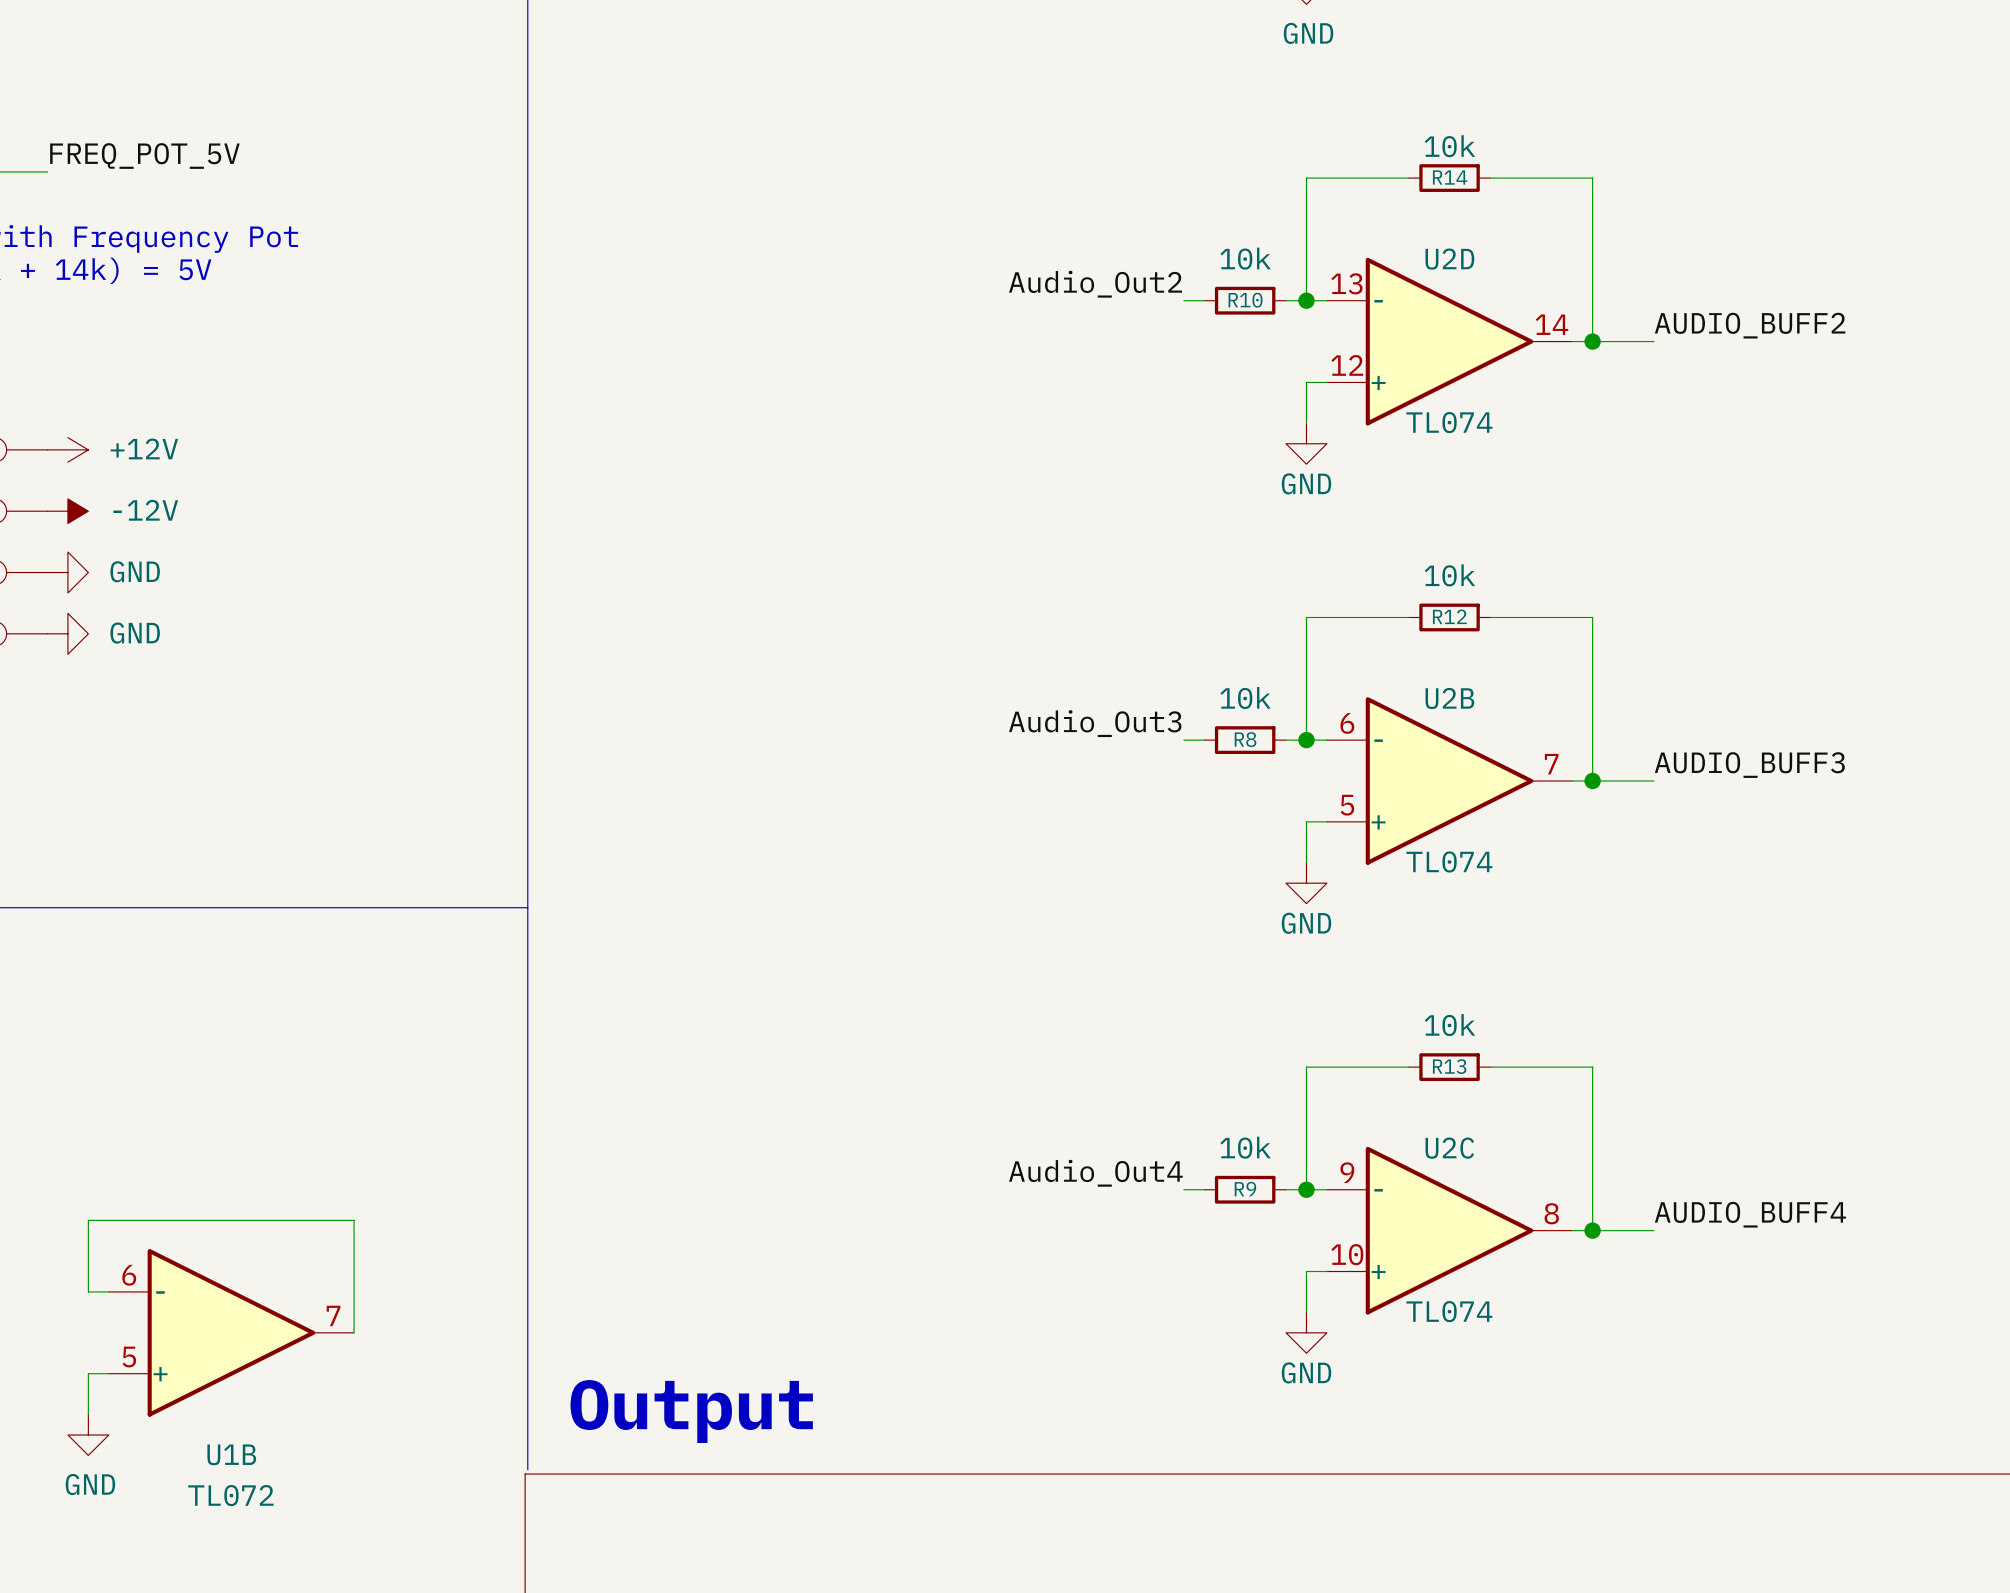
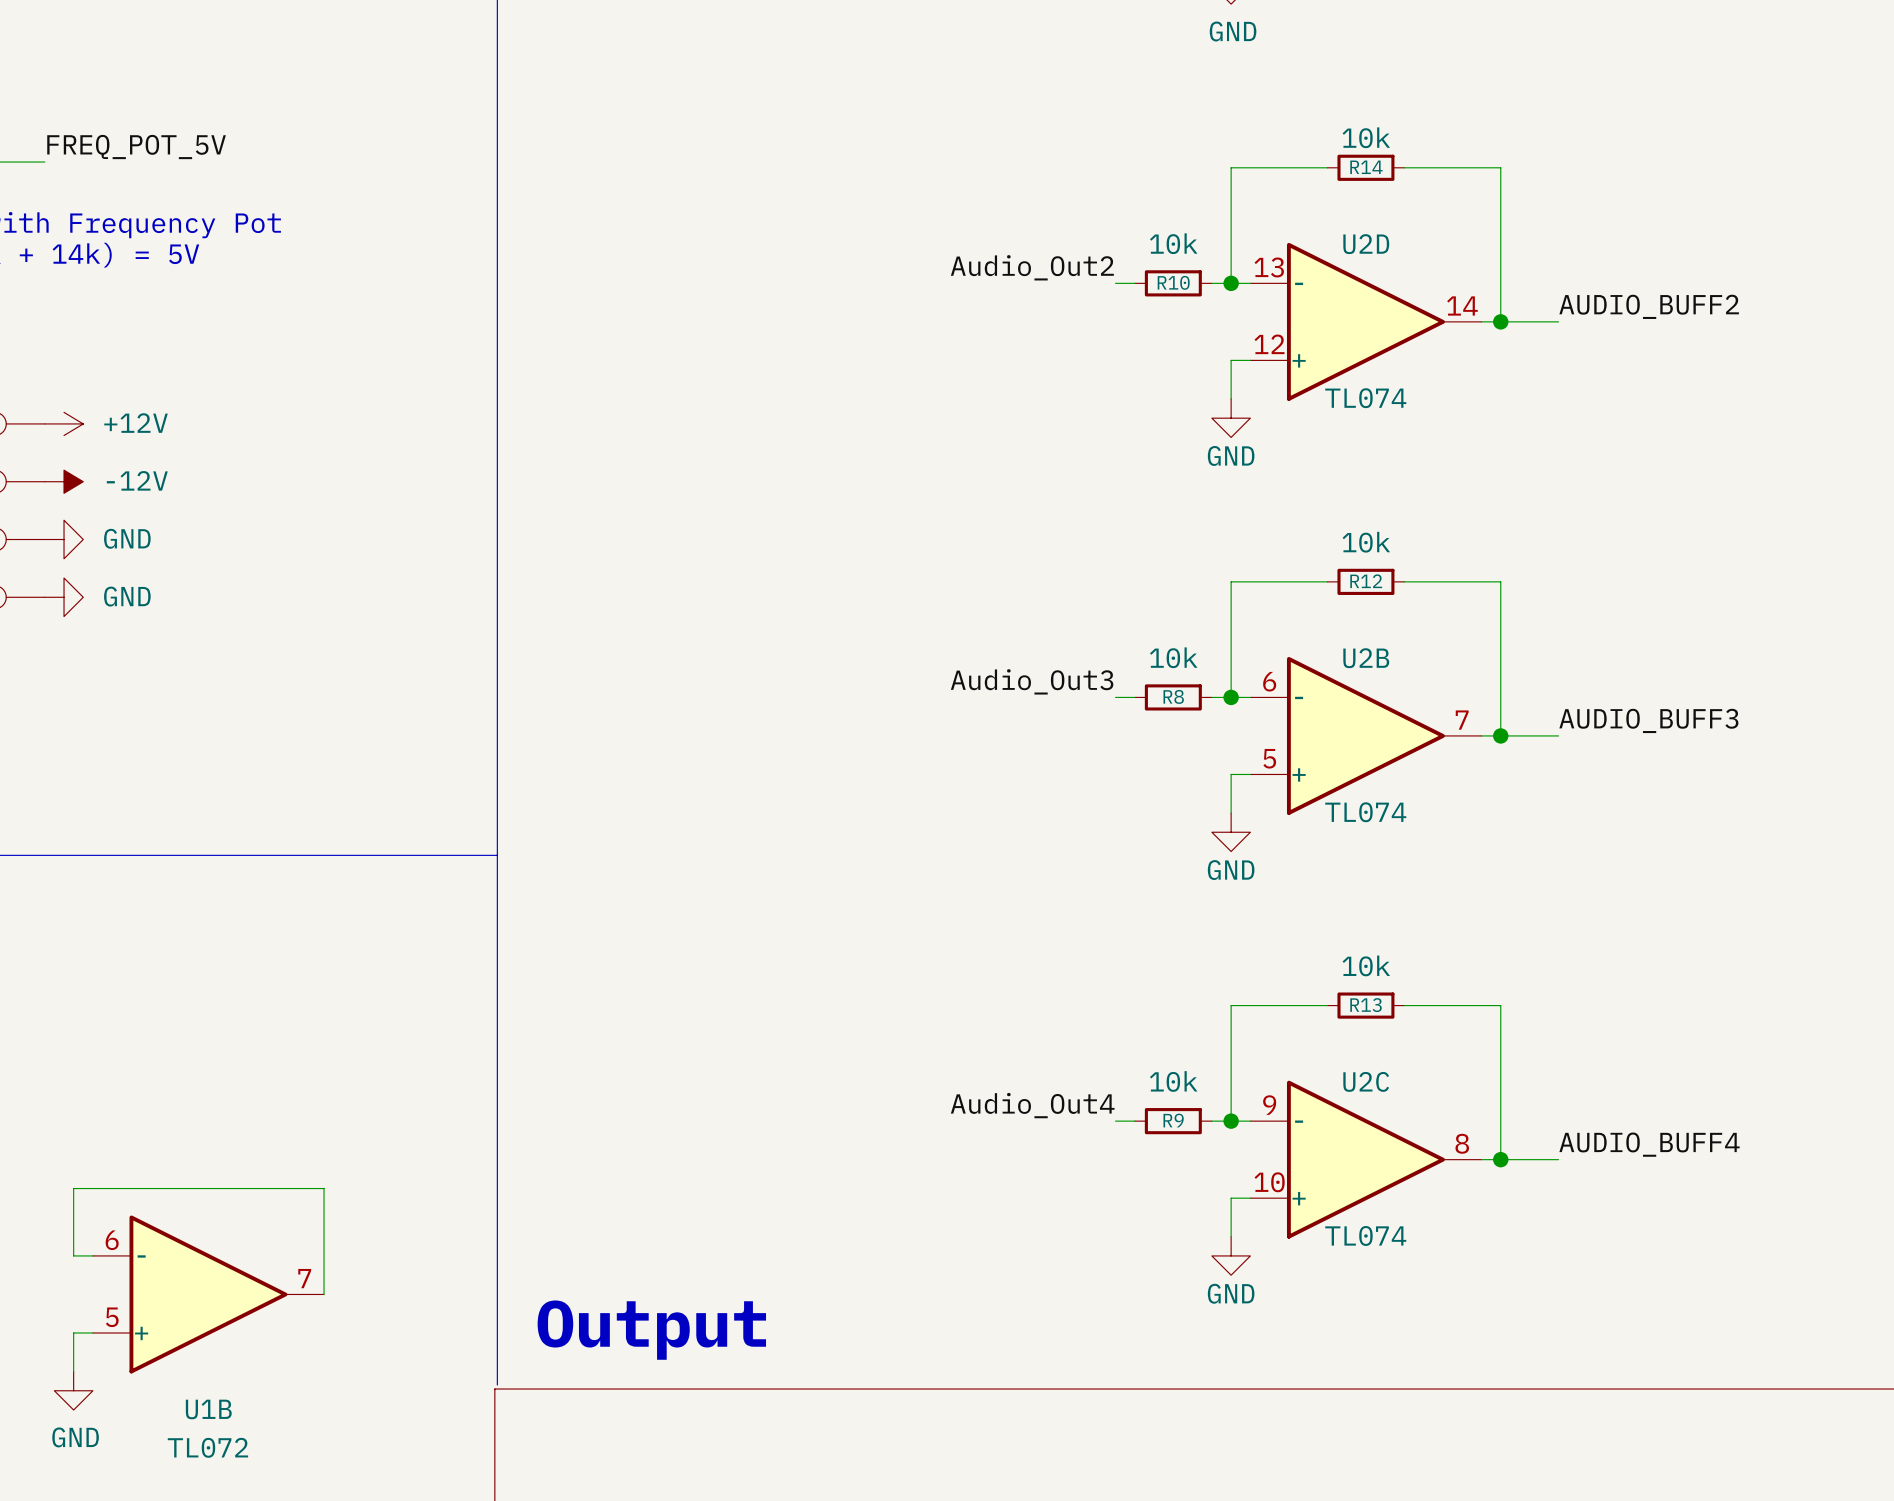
wire: (108, 1291) (88, 1291) (88, 1220) (354, 1220) (354, 1332) -> (92, 1255) (73, 1255) (73, 1188) (324, 1188) (324, 1294)
U1B position: (231, 1332) -> (208, 1294)
wire: (108, 1373) (88, 1373) (88, 1414) -> (92, 1332) (73, 1332) (73, 1371)
power symbol position: GND (88, 1435) -> GND (73, 1390)

